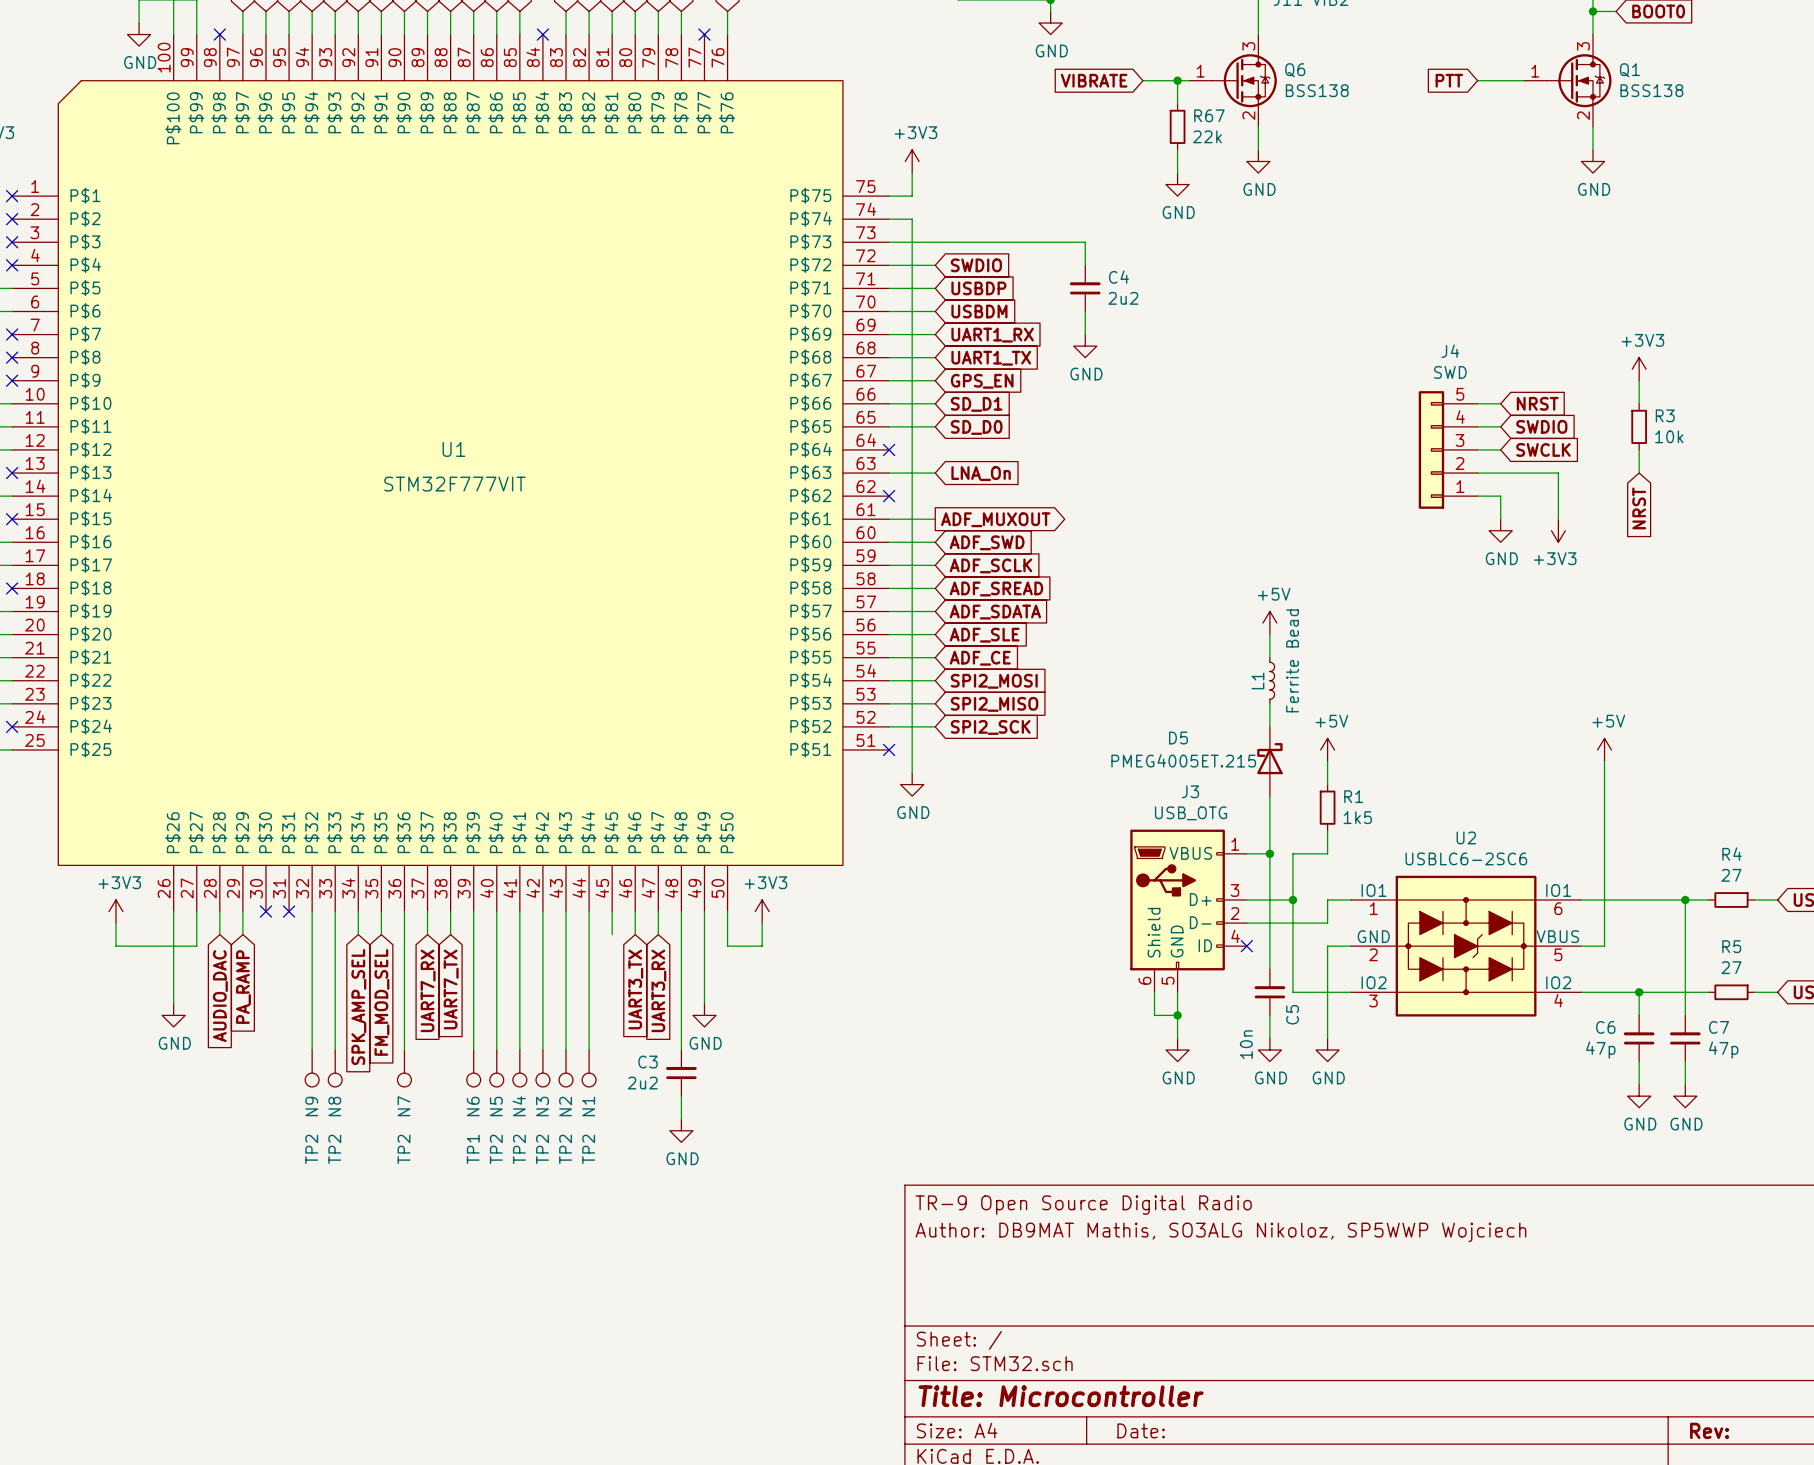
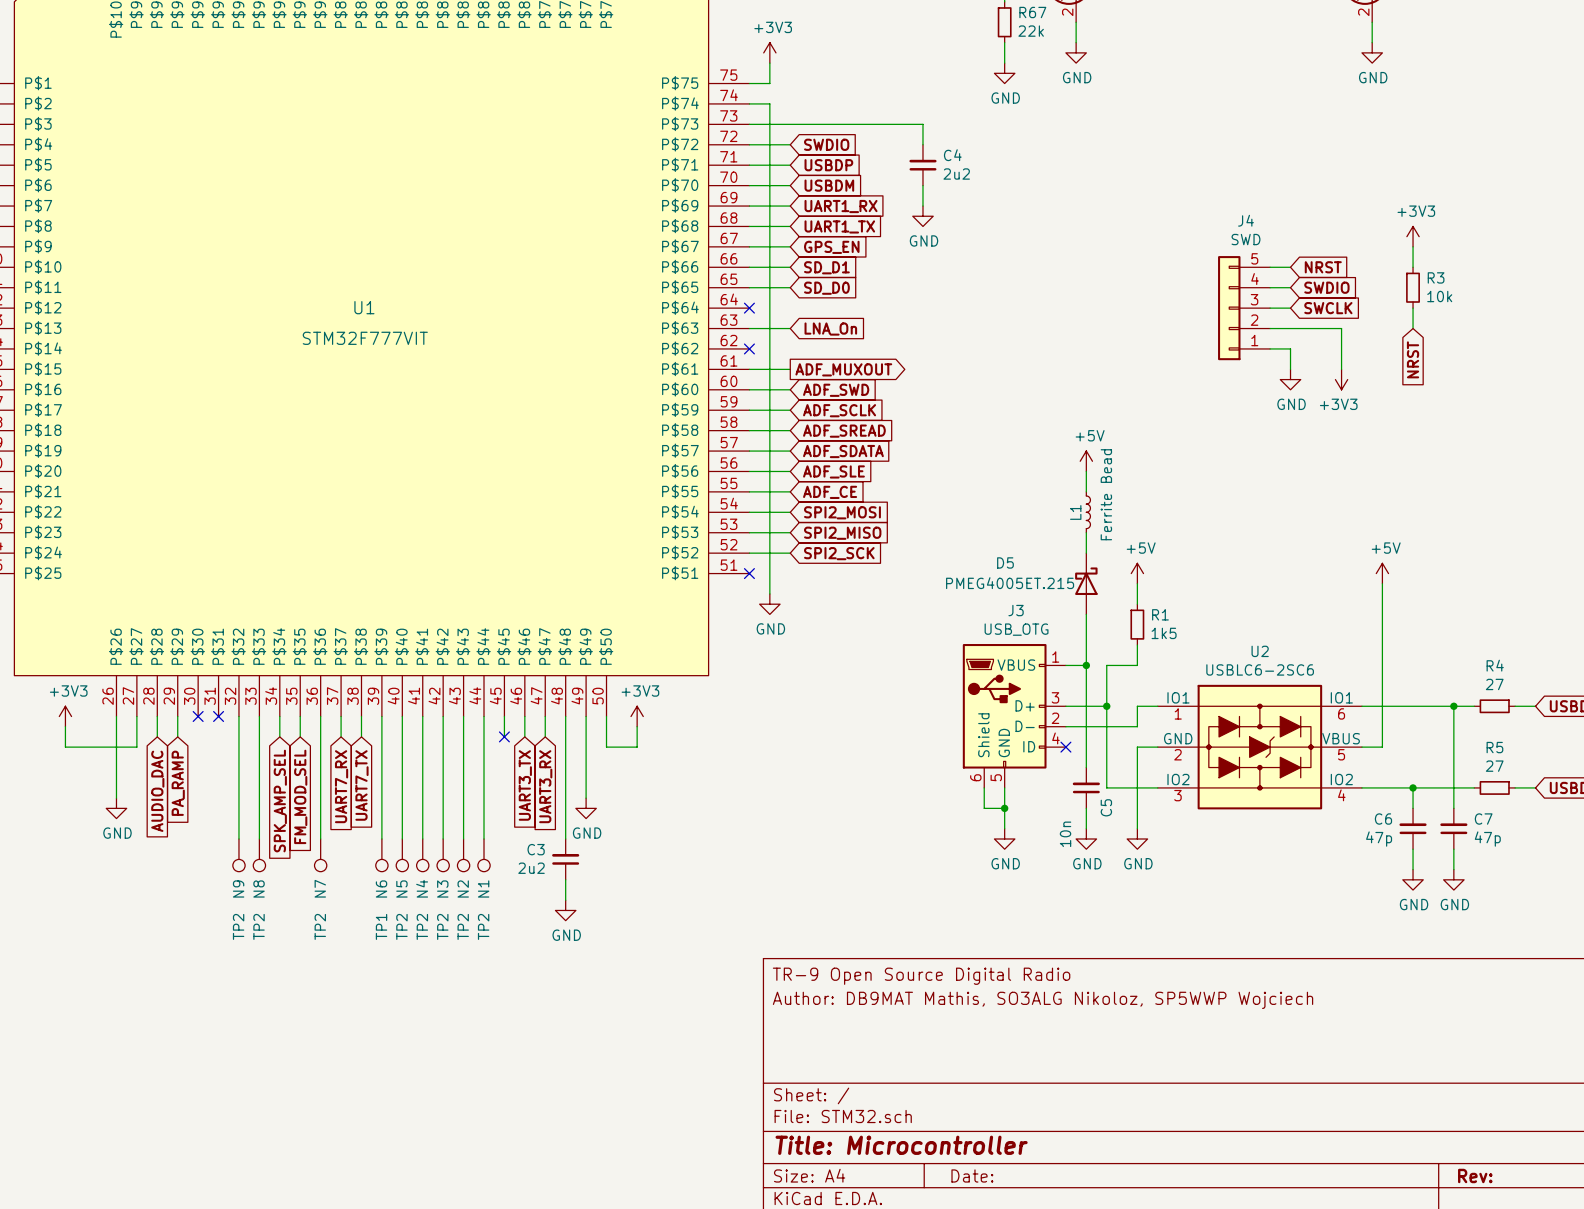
no-connect mark: none -> (504, 736)

